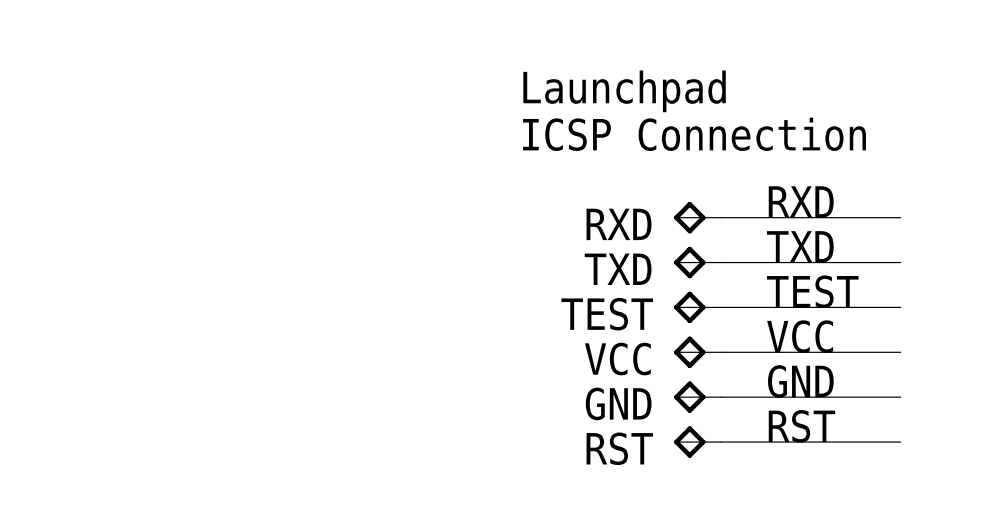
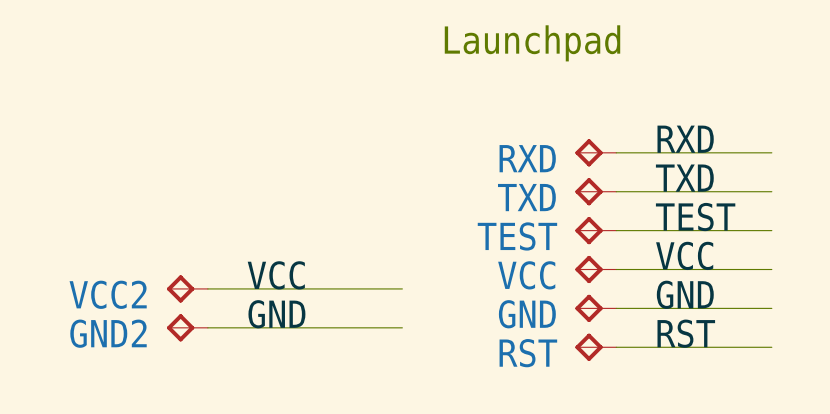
text: ICSP Connection (694, 134) -> none
label: none -> VCC (276, 275)
VCC2: none -> (187, 288)
wire: none -> (207, 288) (402, 288)
label: none -> GND (276, 314)
GND2: none -> (187, 327)
wire: none -> (207, 327) (402, 327)

